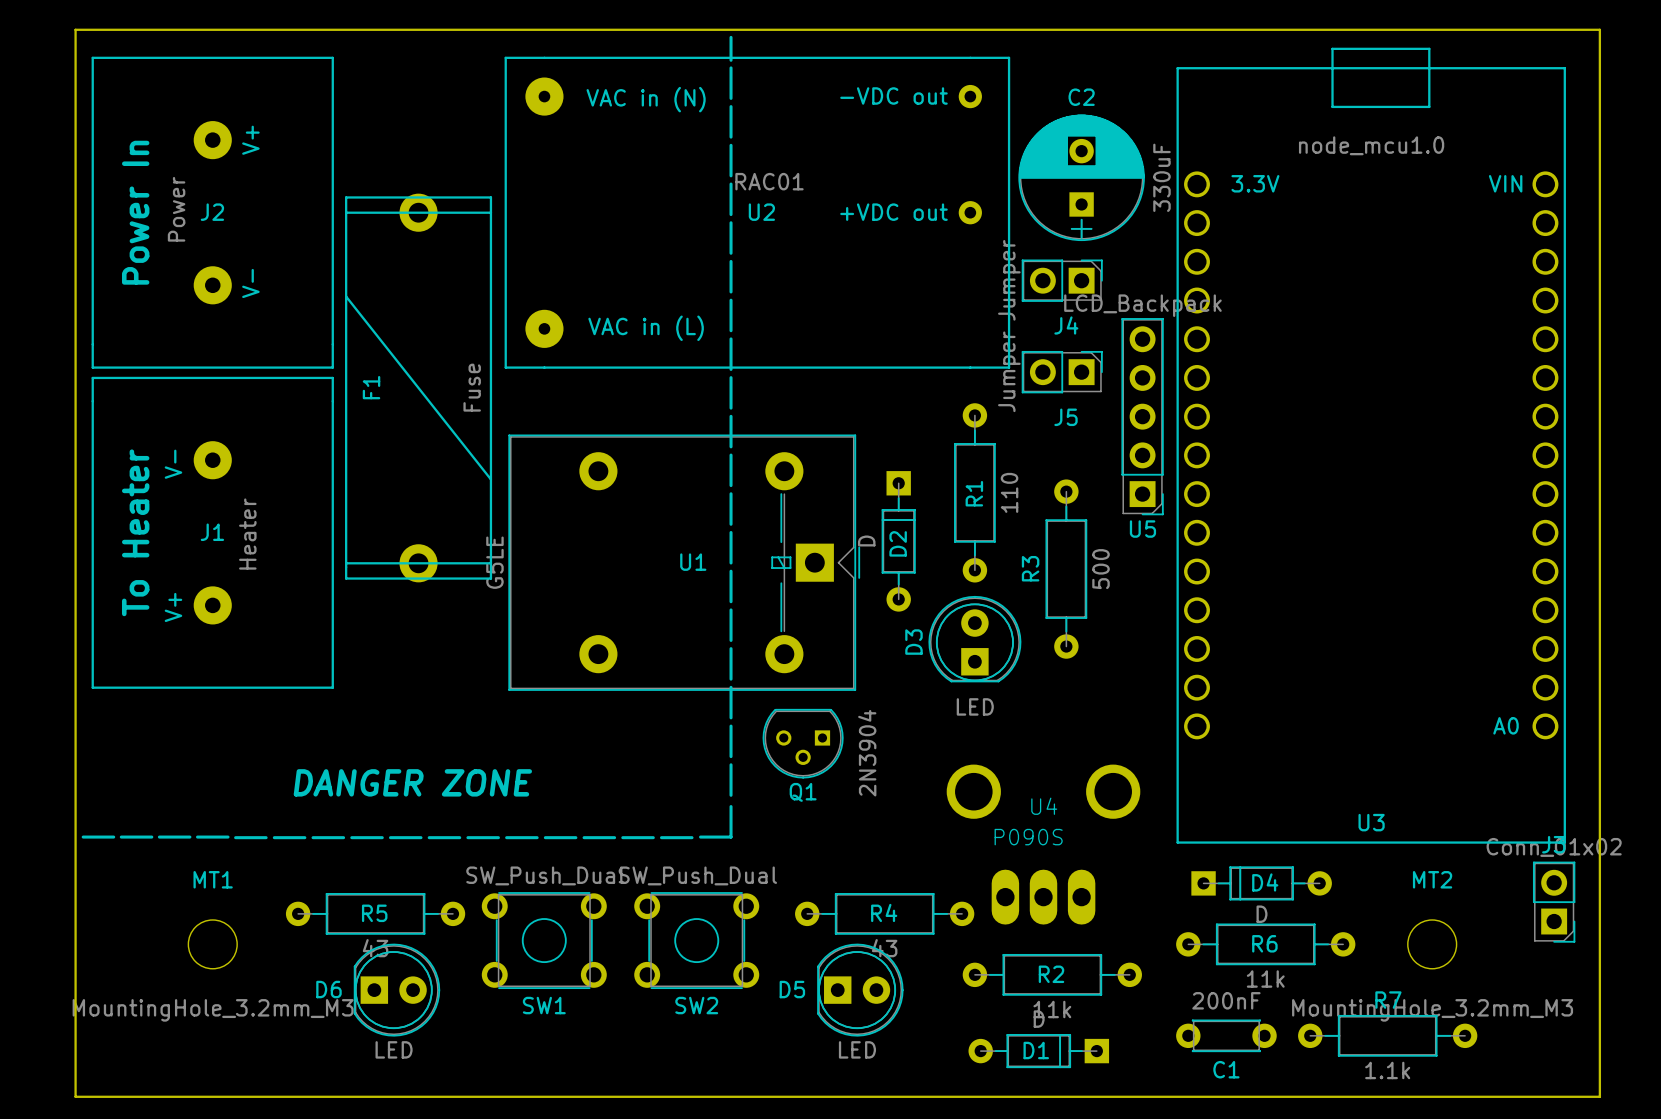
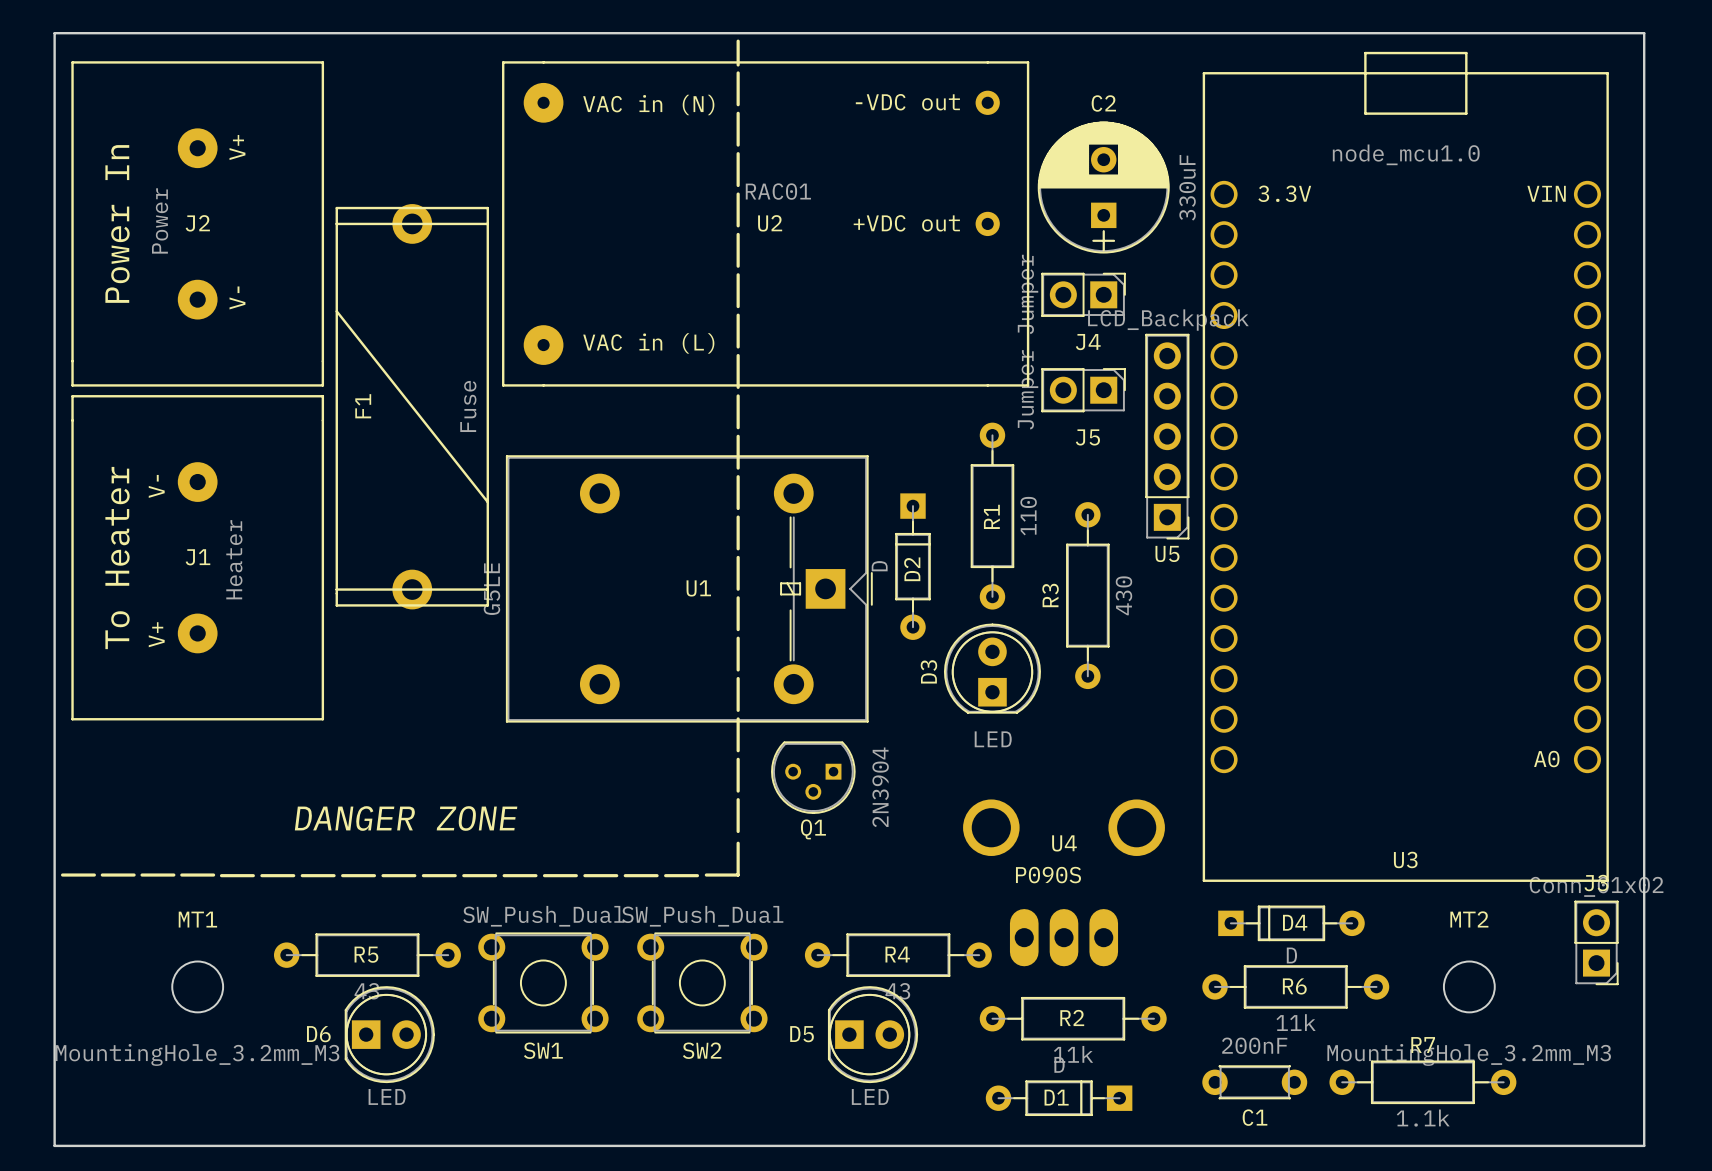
R3 value: 500 (1101, 569) -> 430 (1123, 595)

